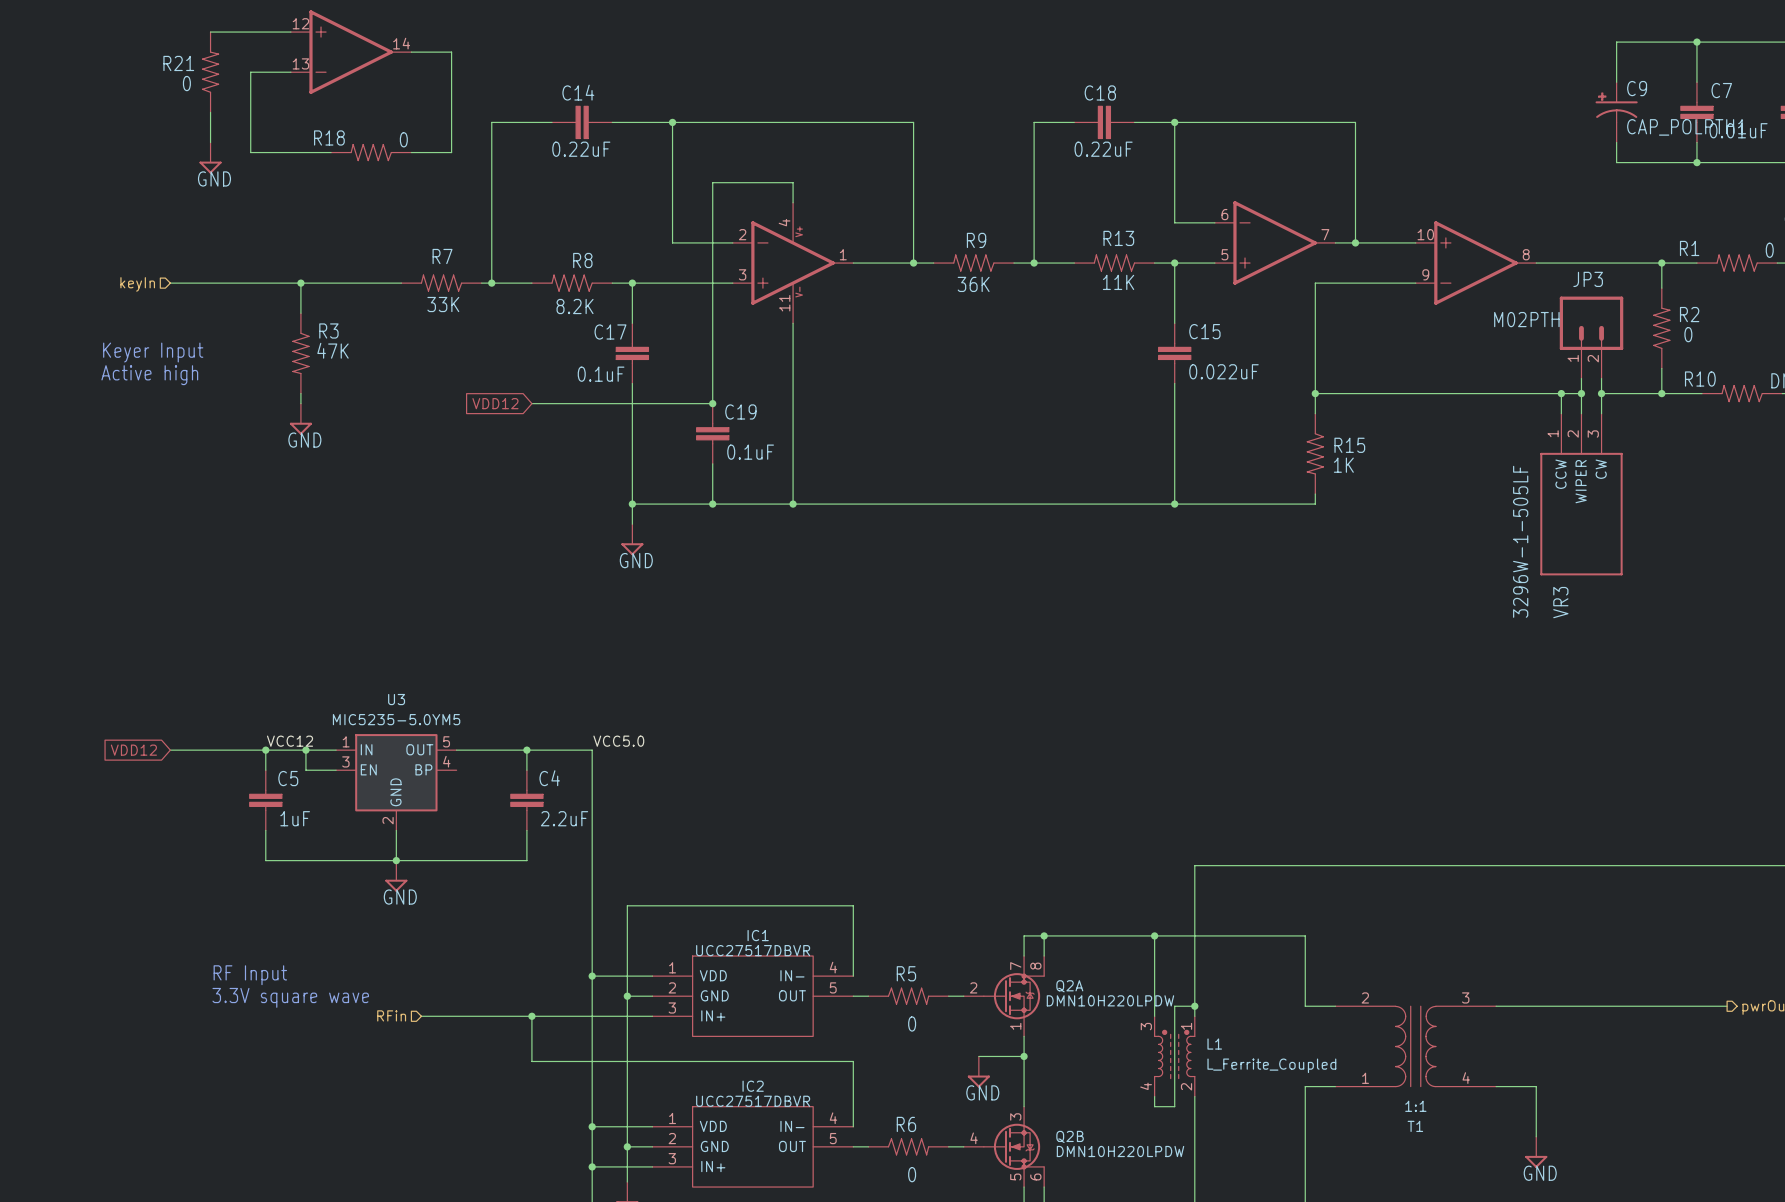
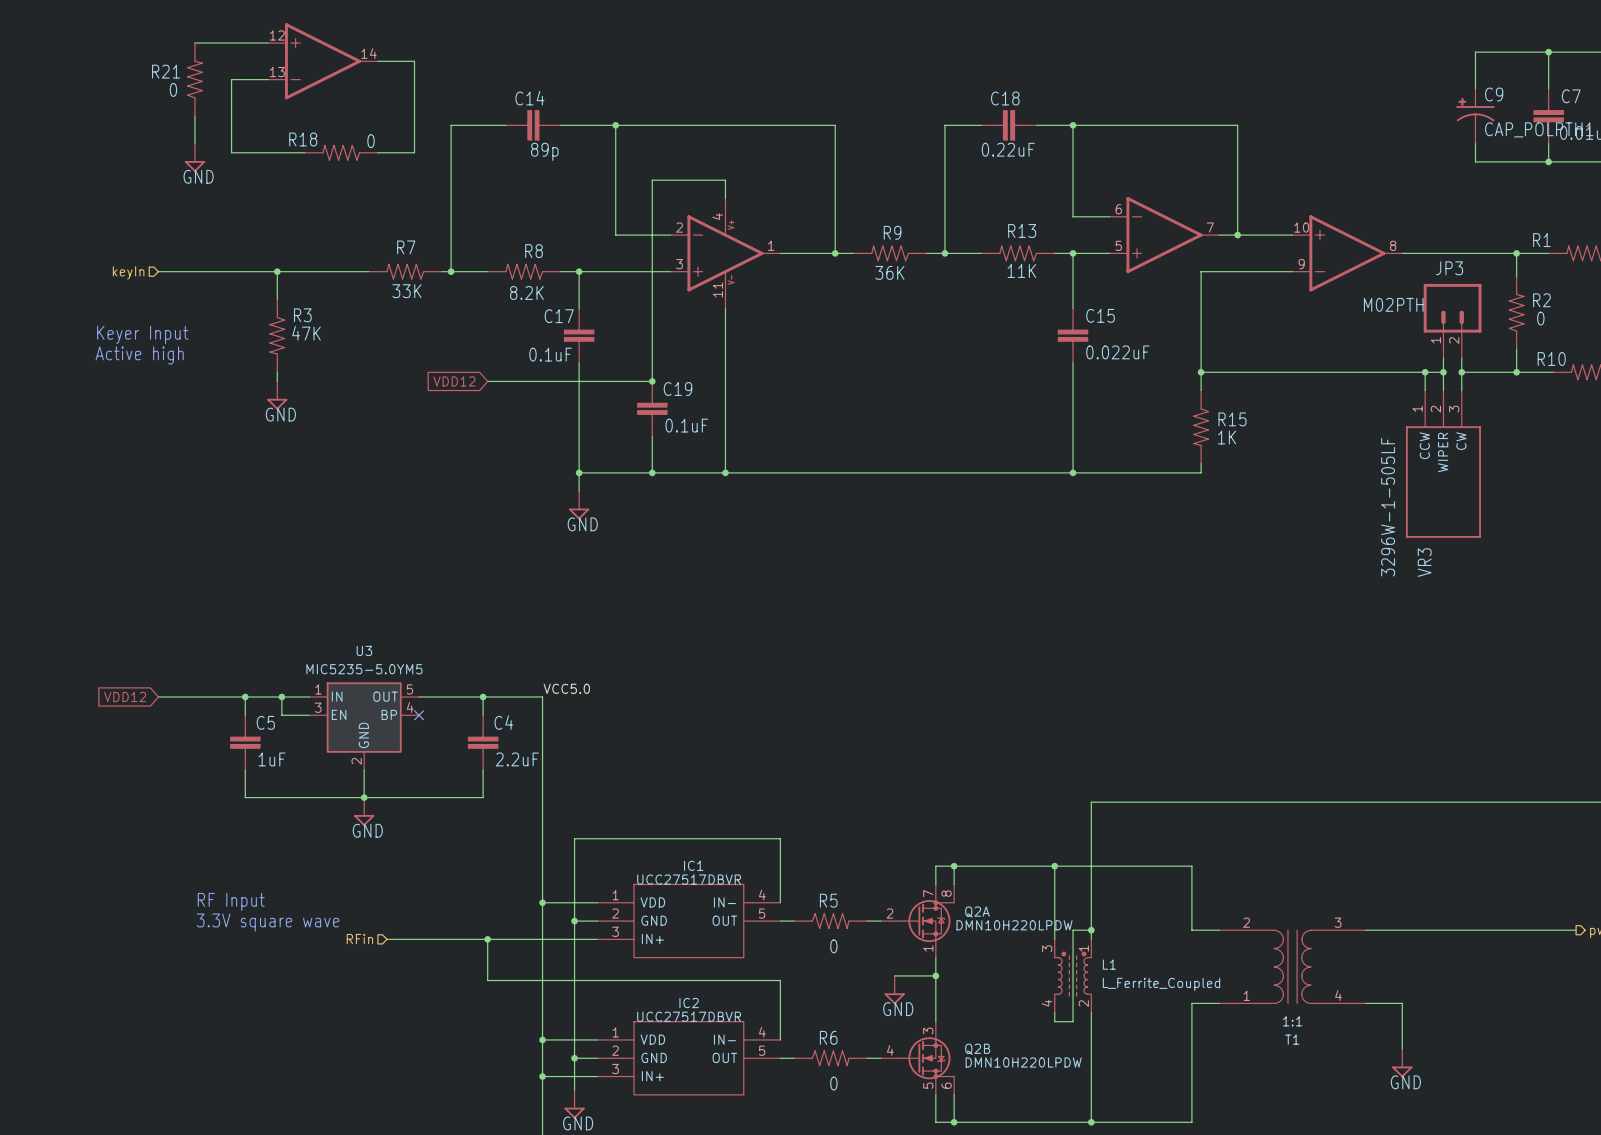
C14 value: 0.22uF (581, 149) -> 89p (544, 151)
label: VCC12 (290, 741) -> none
no-connect mark: none -> (419, 715)

